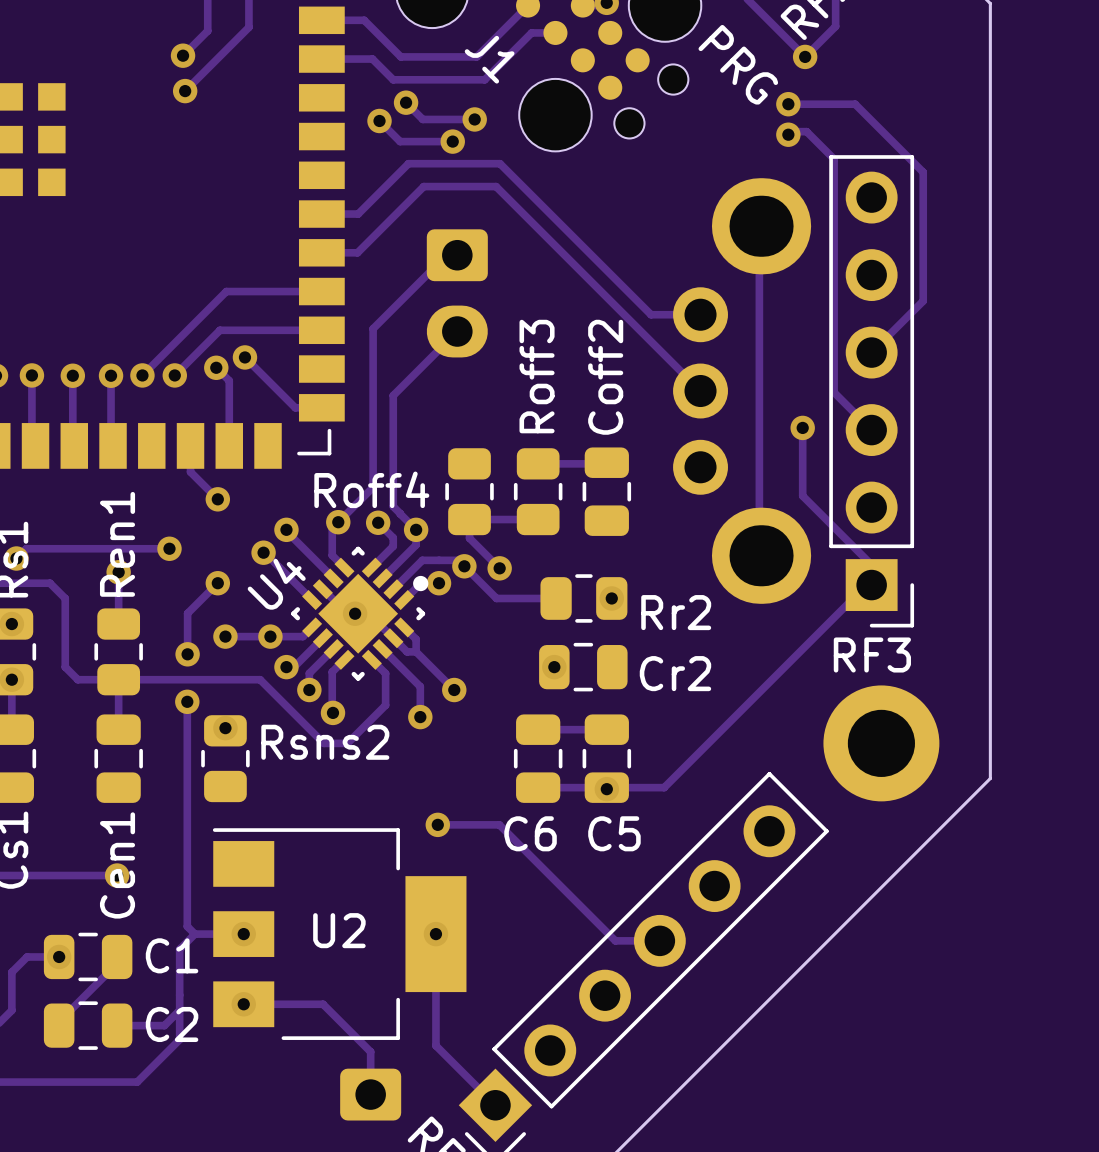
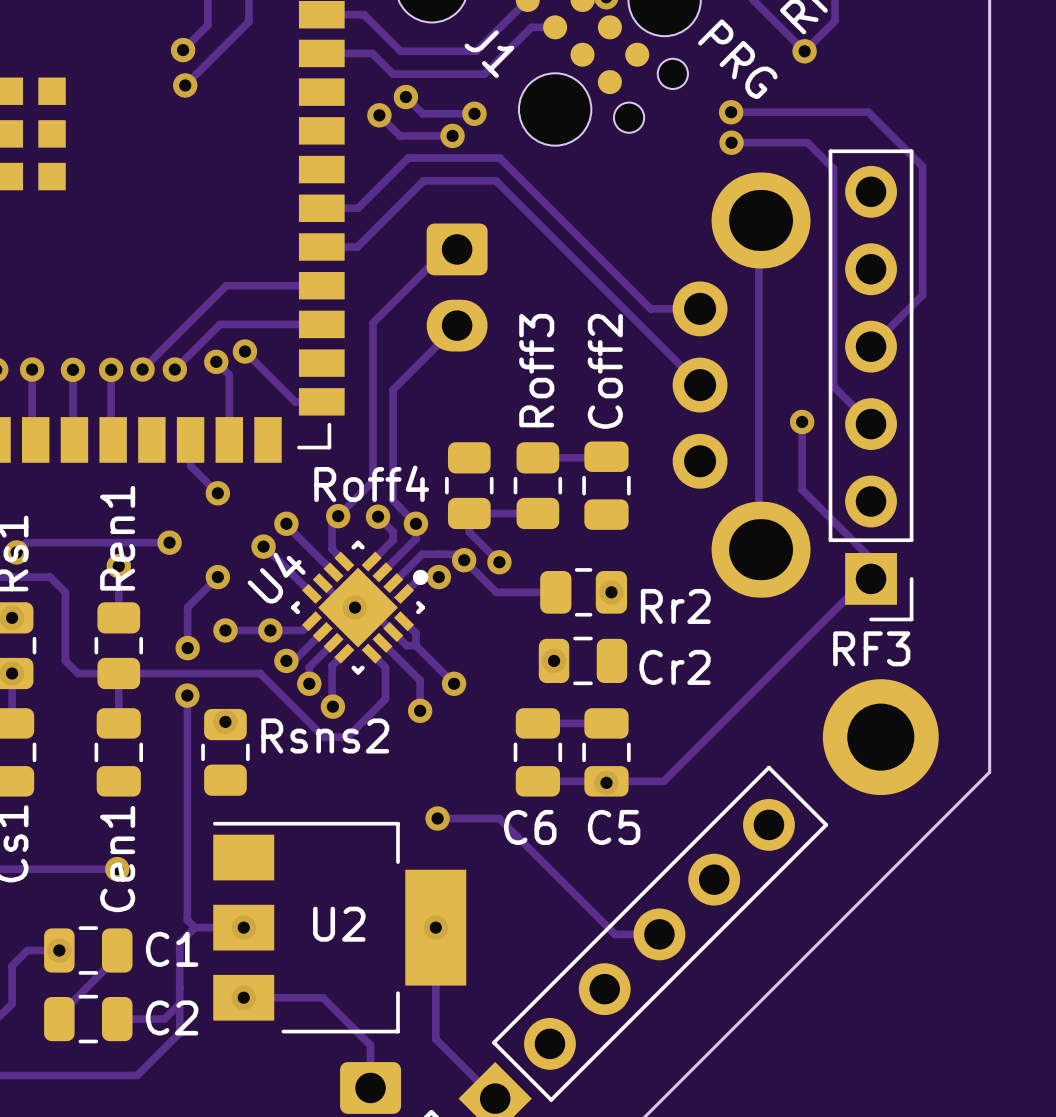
track: (788, 104) (855, 104) (868, 117) -> (731, 112) (868, 112)
via: (788, 104) -> none
via: none -> (731, 112)
track: (788, 134) (791, 131) (806, 131) (834, 159) (834, 174) -> (731, 142) (807, 142) (833, 168)
via: (788, 134) -> none
via: none -> (731, 142)

